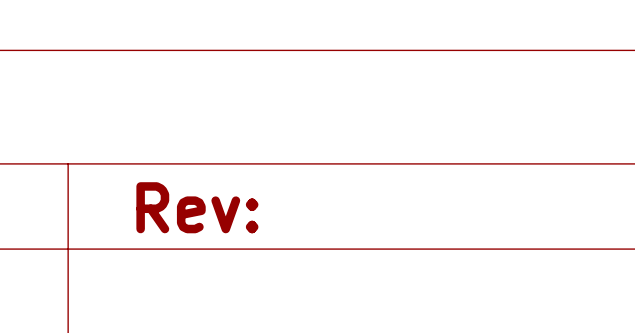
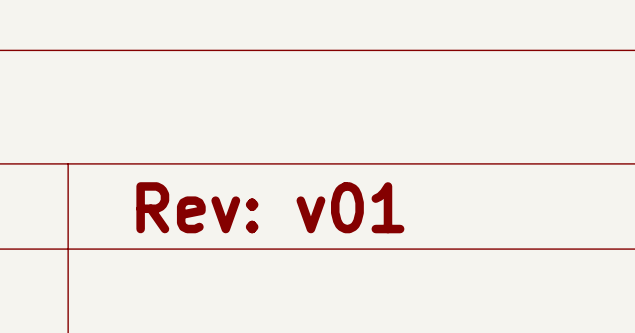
title block: Rev: (197, 207) -> Rev: v01 (270, 207)

